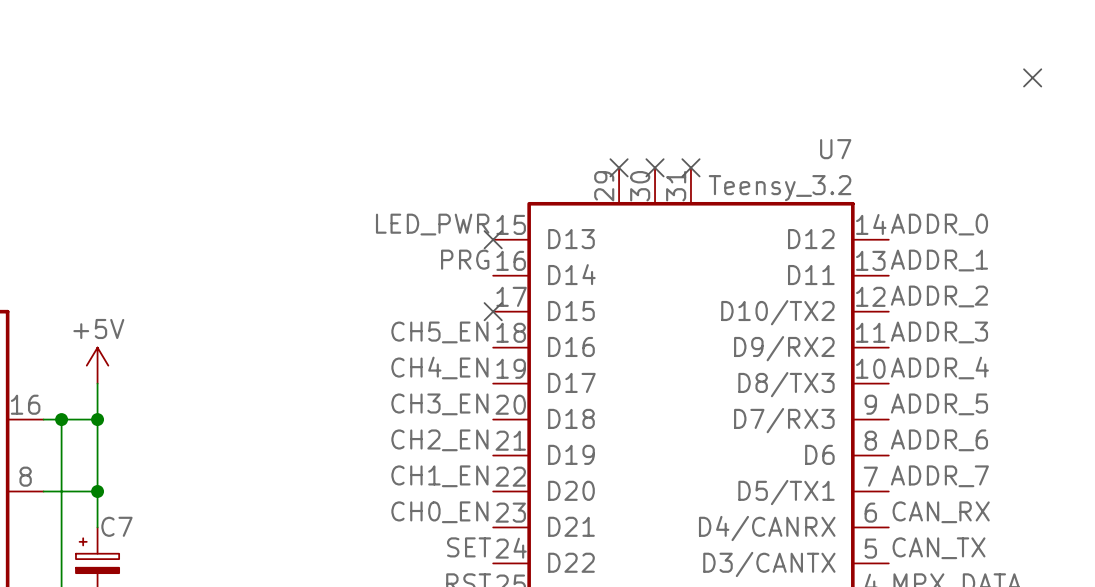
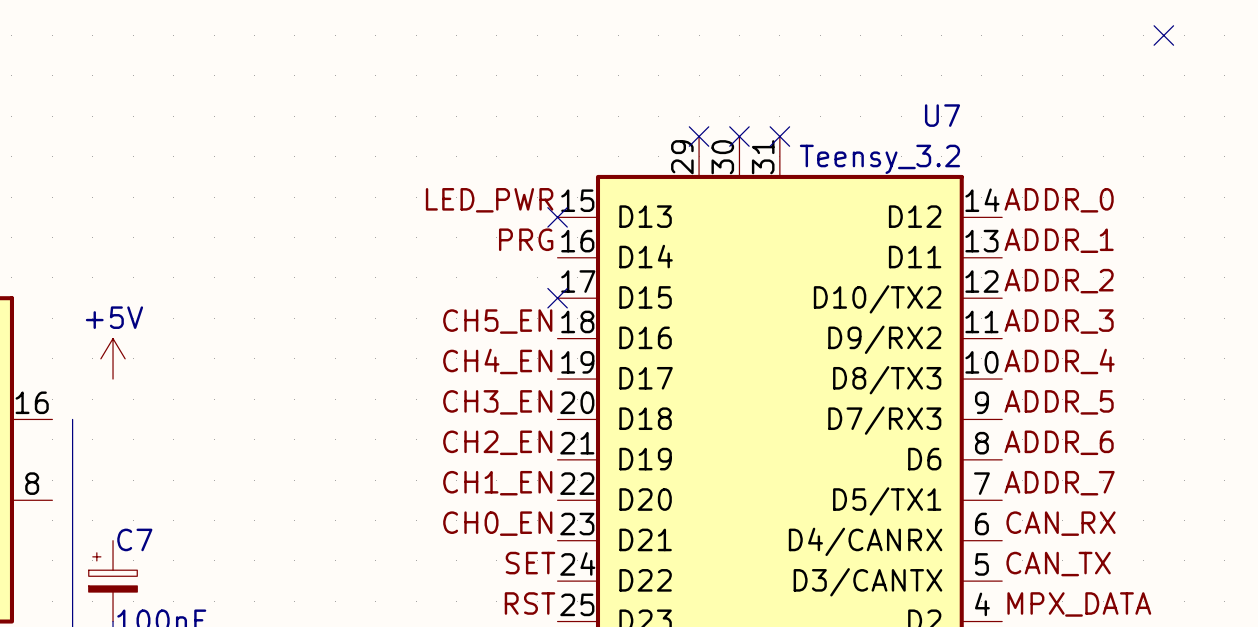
wire: (97, 383) (97, 527) -> none
wire: (43, 419) (97, 419) -> none
junction: (61, 419) -> none
junction: (97, 419) -> none
wire: (43, 491) (97, 491) -> none
junction: (97, 491) -> none

